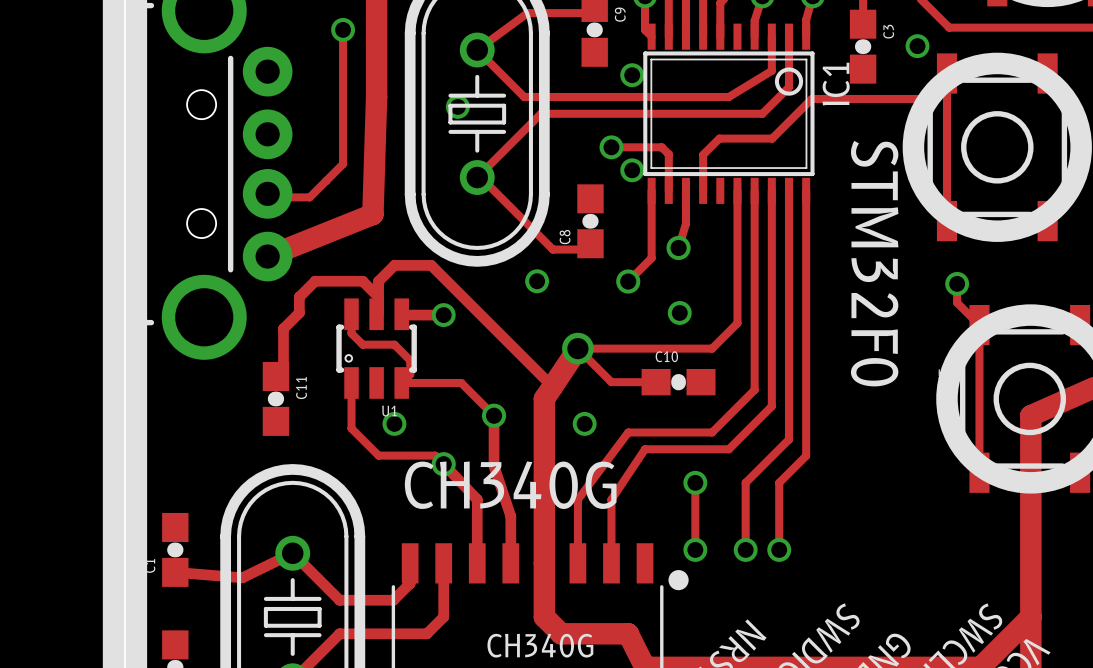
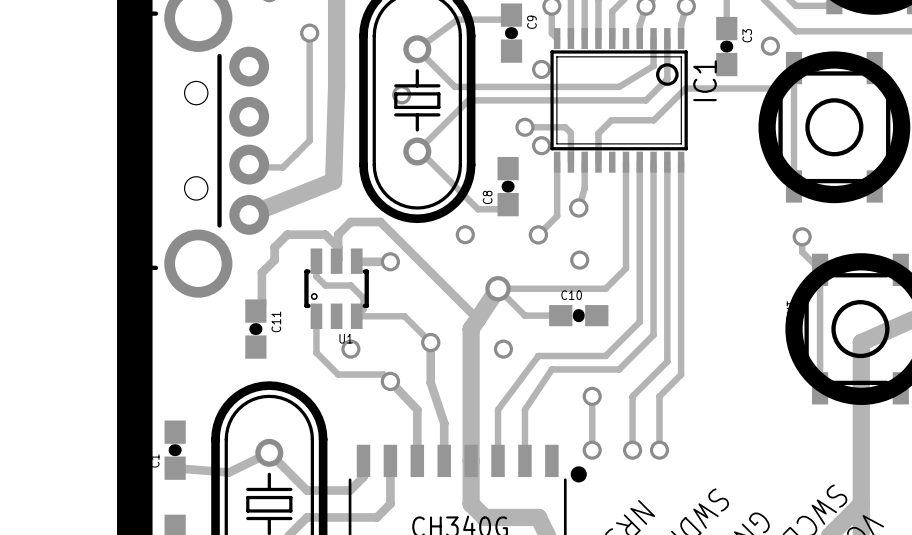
text: STM32F0 (874, 263) -> none
text: CH340G (510, 485) -> none

